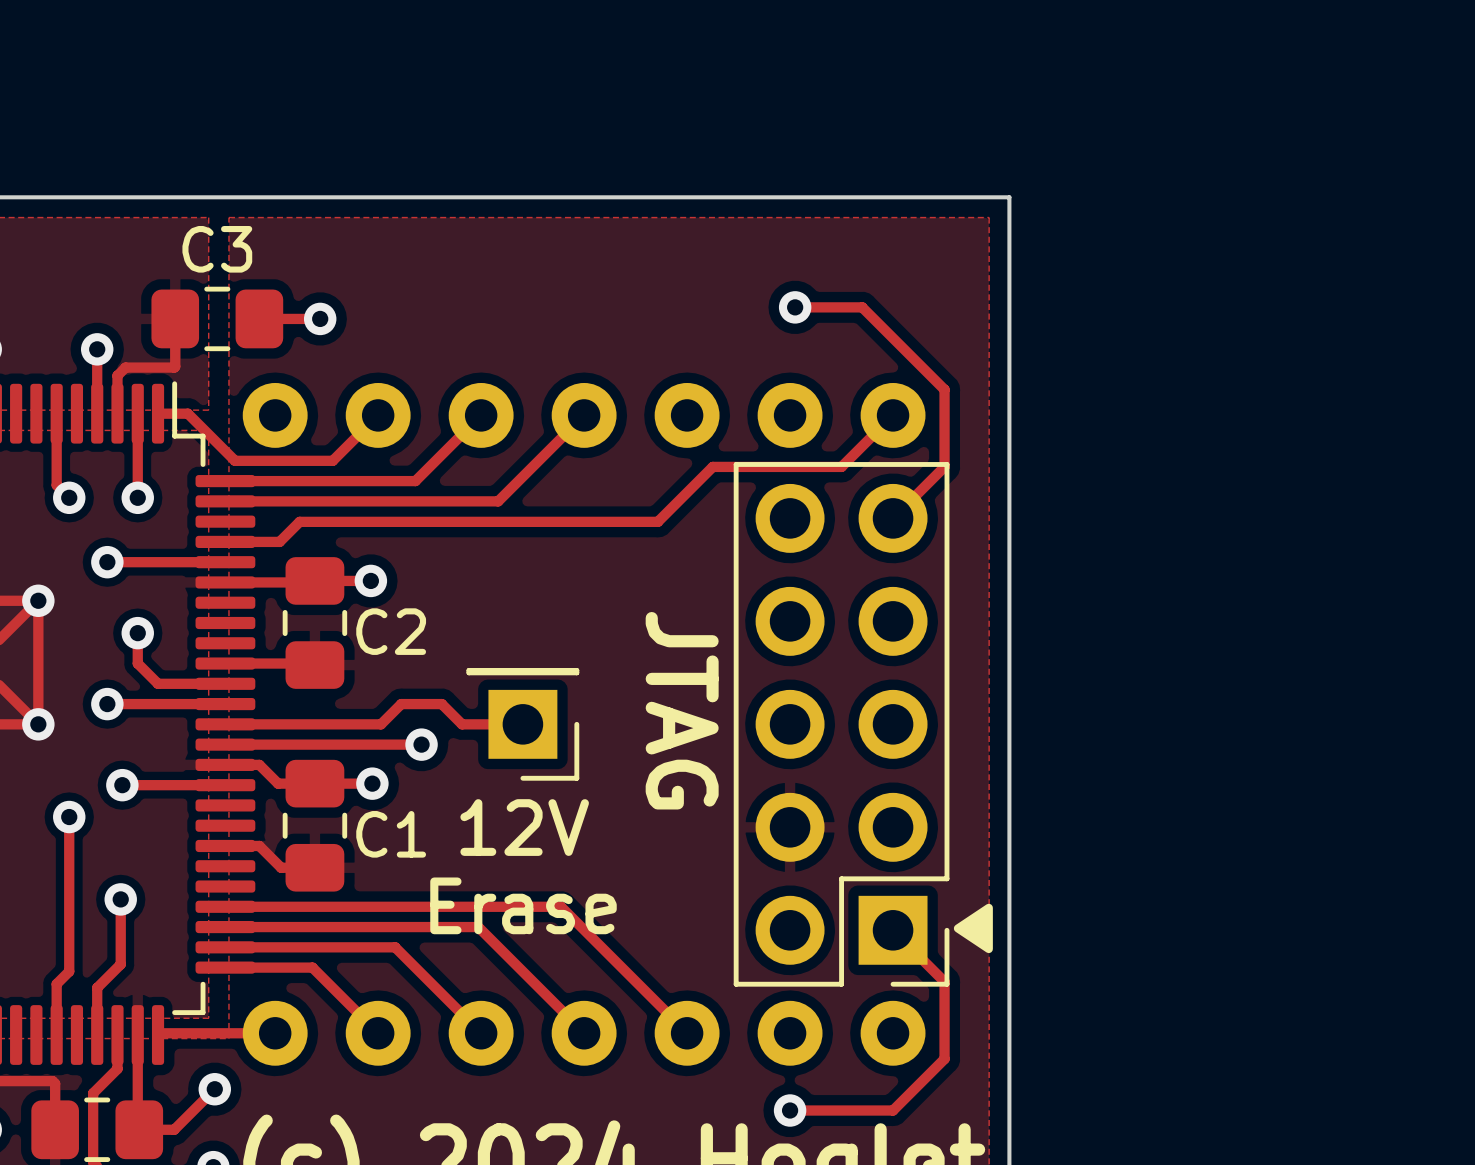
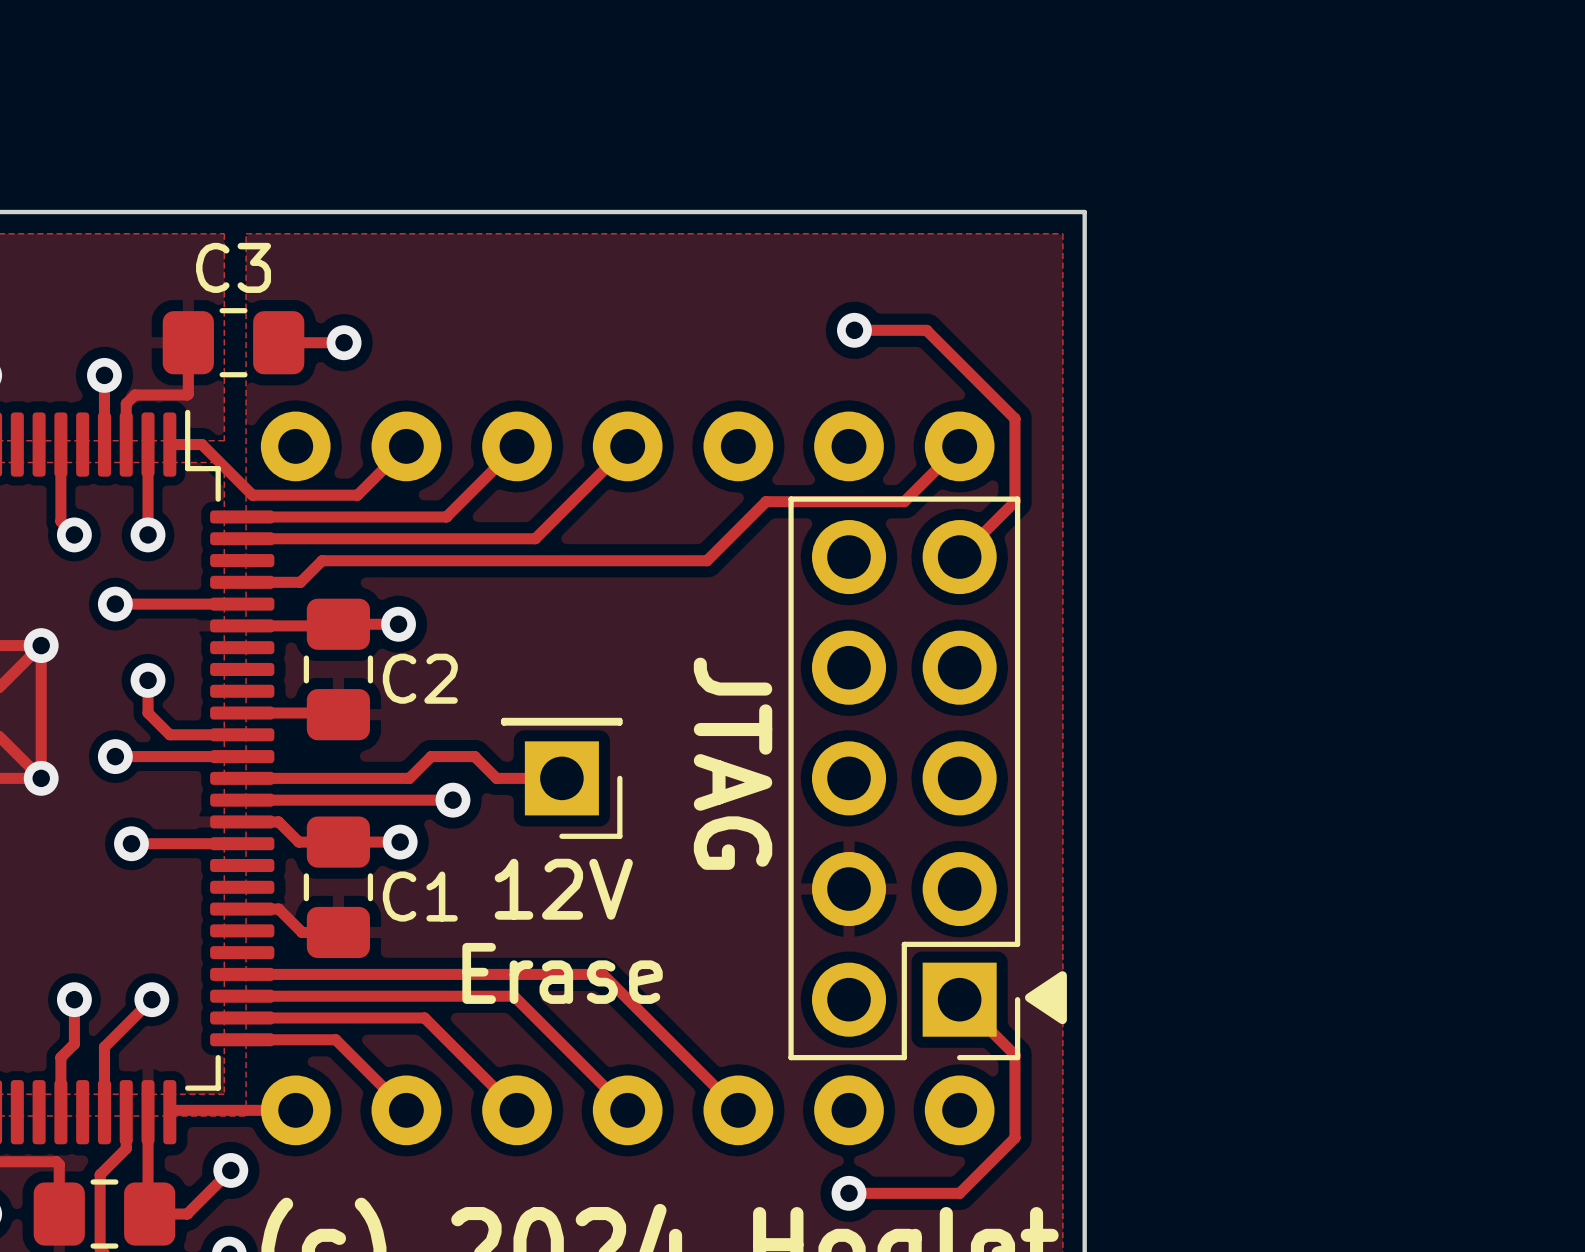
track: (69, 817) (69, 930) -> none
via: (69, 817) -> none
track: (120, 899) (120, 964) (97, 987) -> (151, 999) (104, 1047) (104, 1061)
via position: (120, 899) -> (151, 999)
via: none -> (74, 999)

